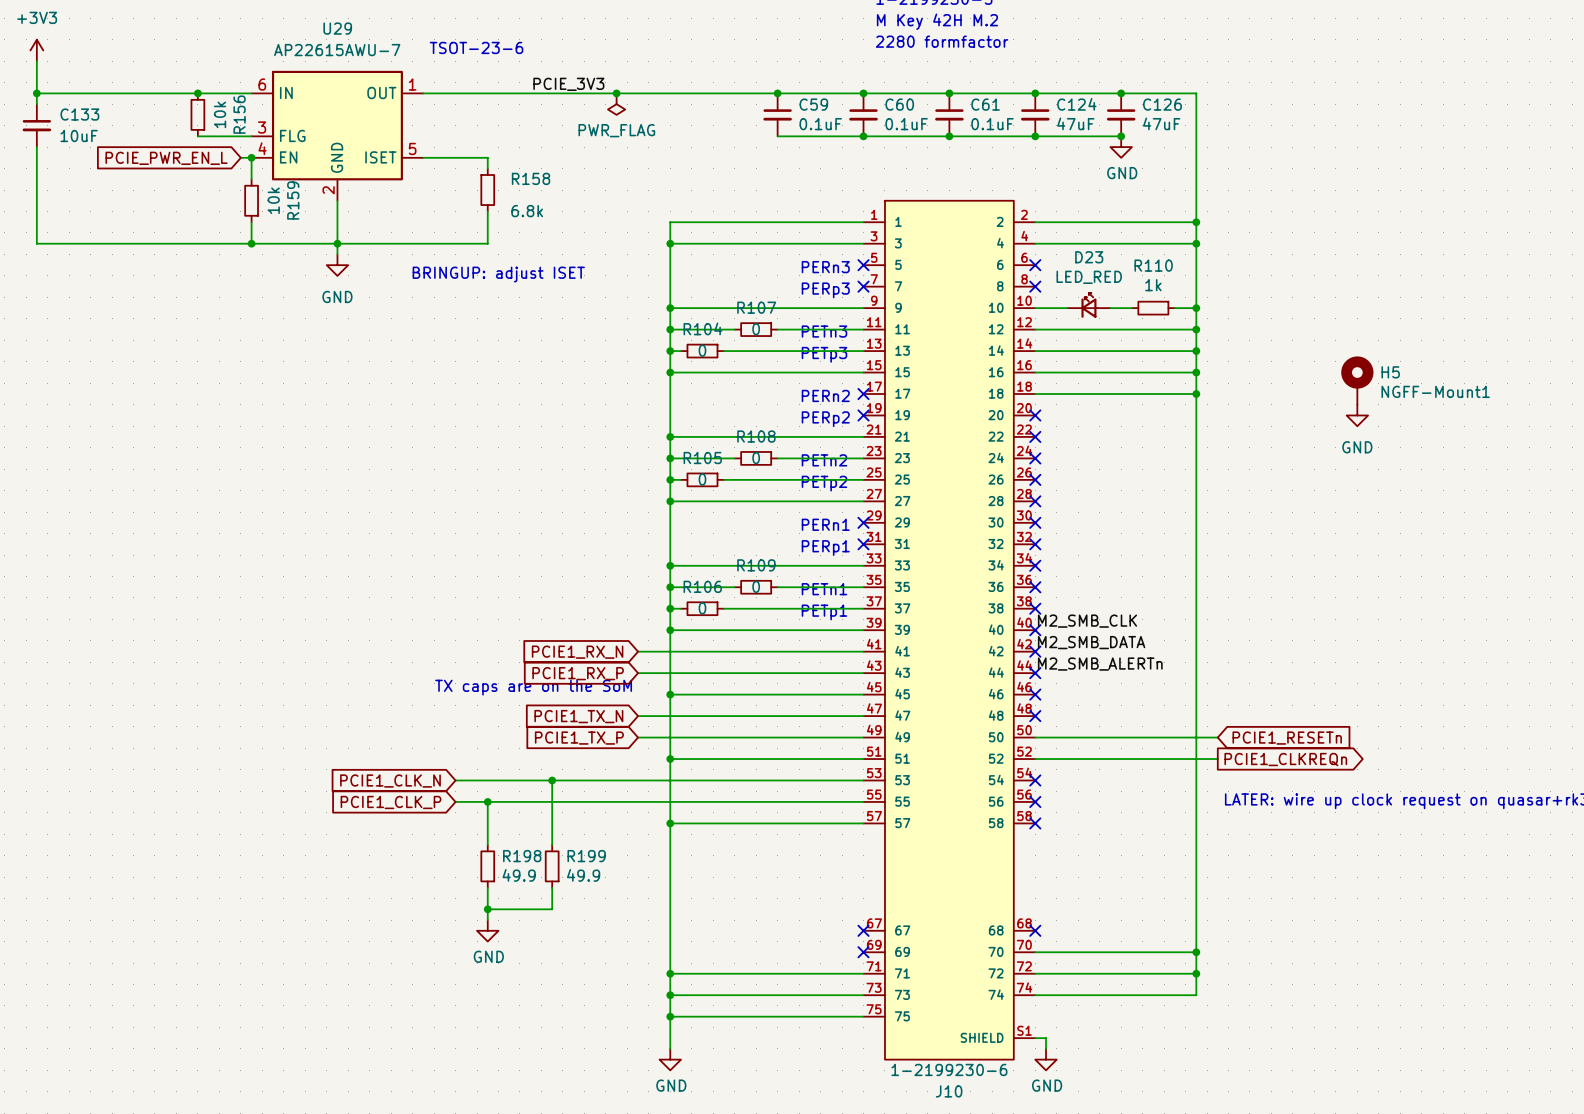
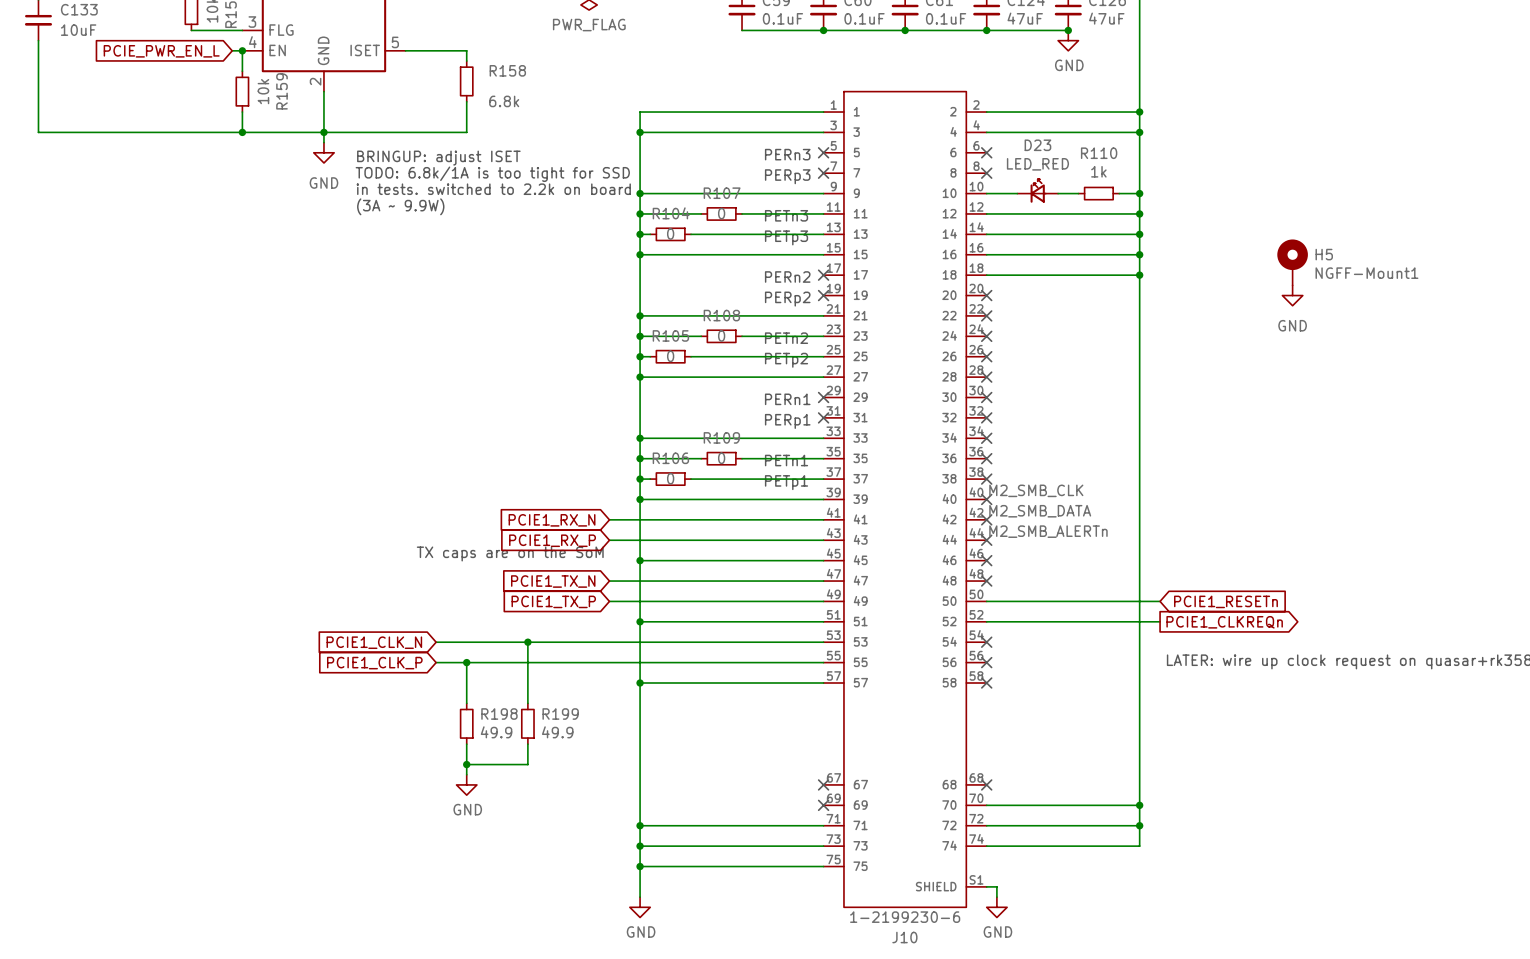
text position: BRINGUP: adjust ISET (498, 274) -> BRINGUP: adjust ISET (438, 158)
text: none -> TODO: 6.8k/1A is too tight for SSD (492, 174)
text: none -> in tests. switched to 2.2k on board (493, 189)
text: none -> (3A ~ 9.9W) (400, 206)

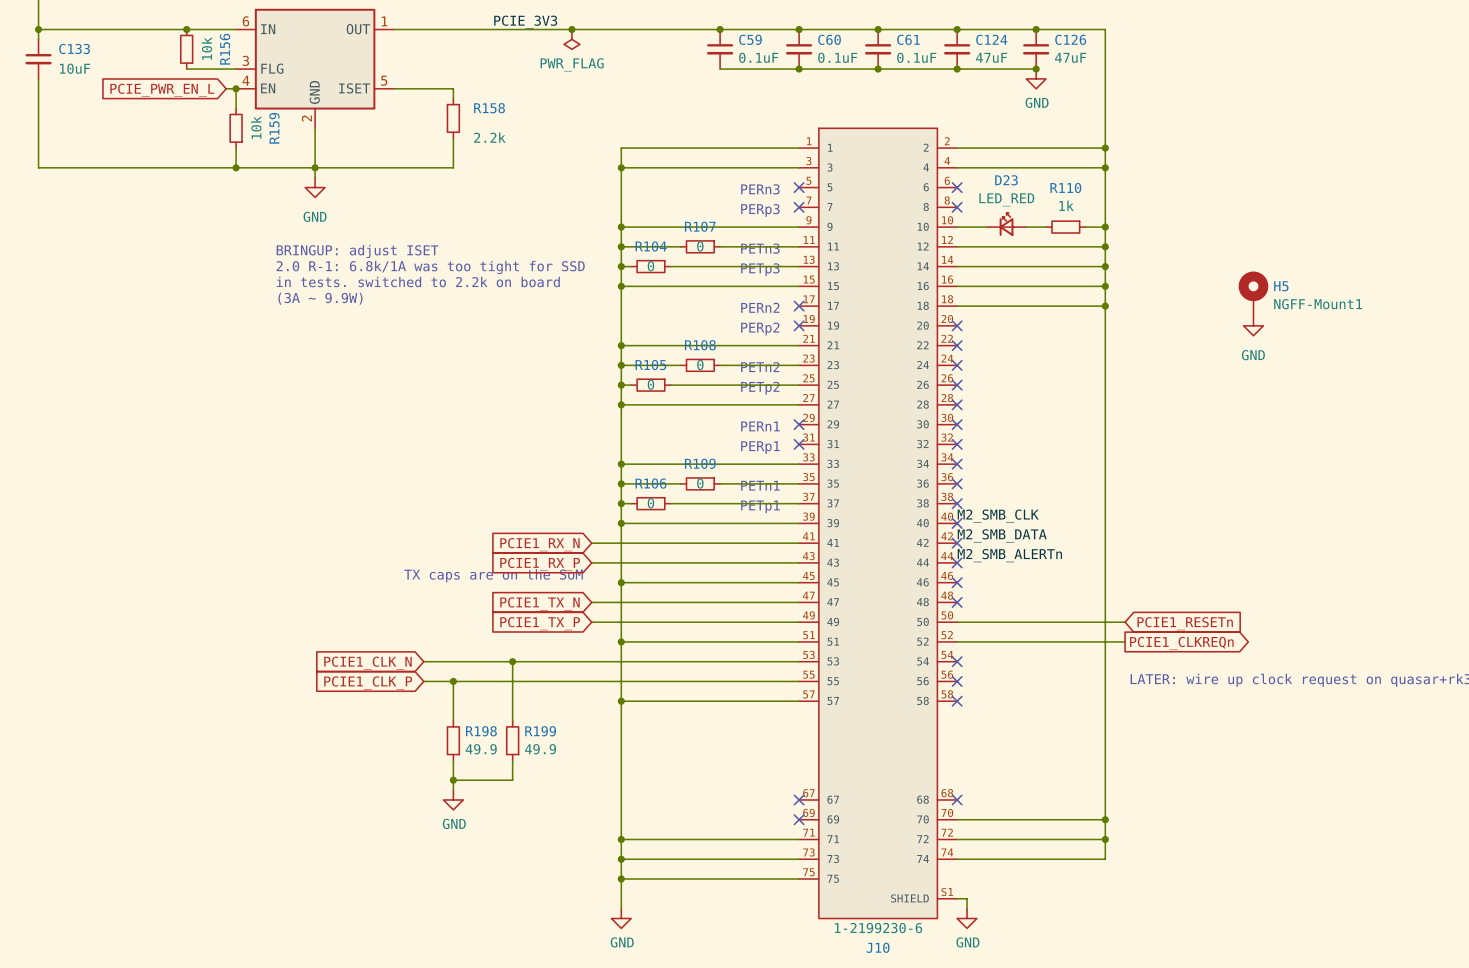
R158 value: 6.8k (504, 101) -> 2.2k (489, 137)
text position: BRINGUP: adjust ISET (438, 158) -> BRINGUP: adjust ISET (357, 251)
text: TODO: 6.8k/1A is too tight for SSD (492, 174) -> none
text position: in tests. switched to 2.2k on board (493, 189) -> in tests. switched to 2.2k on board (418, 281)
text position: (3A ~ 9.9W) (400, 206) -> (3A ~ 9.9W) (320, 298)
text: none -> 2.0 R-1: 6.8k/1A was too tight for SSD (430, 267)

